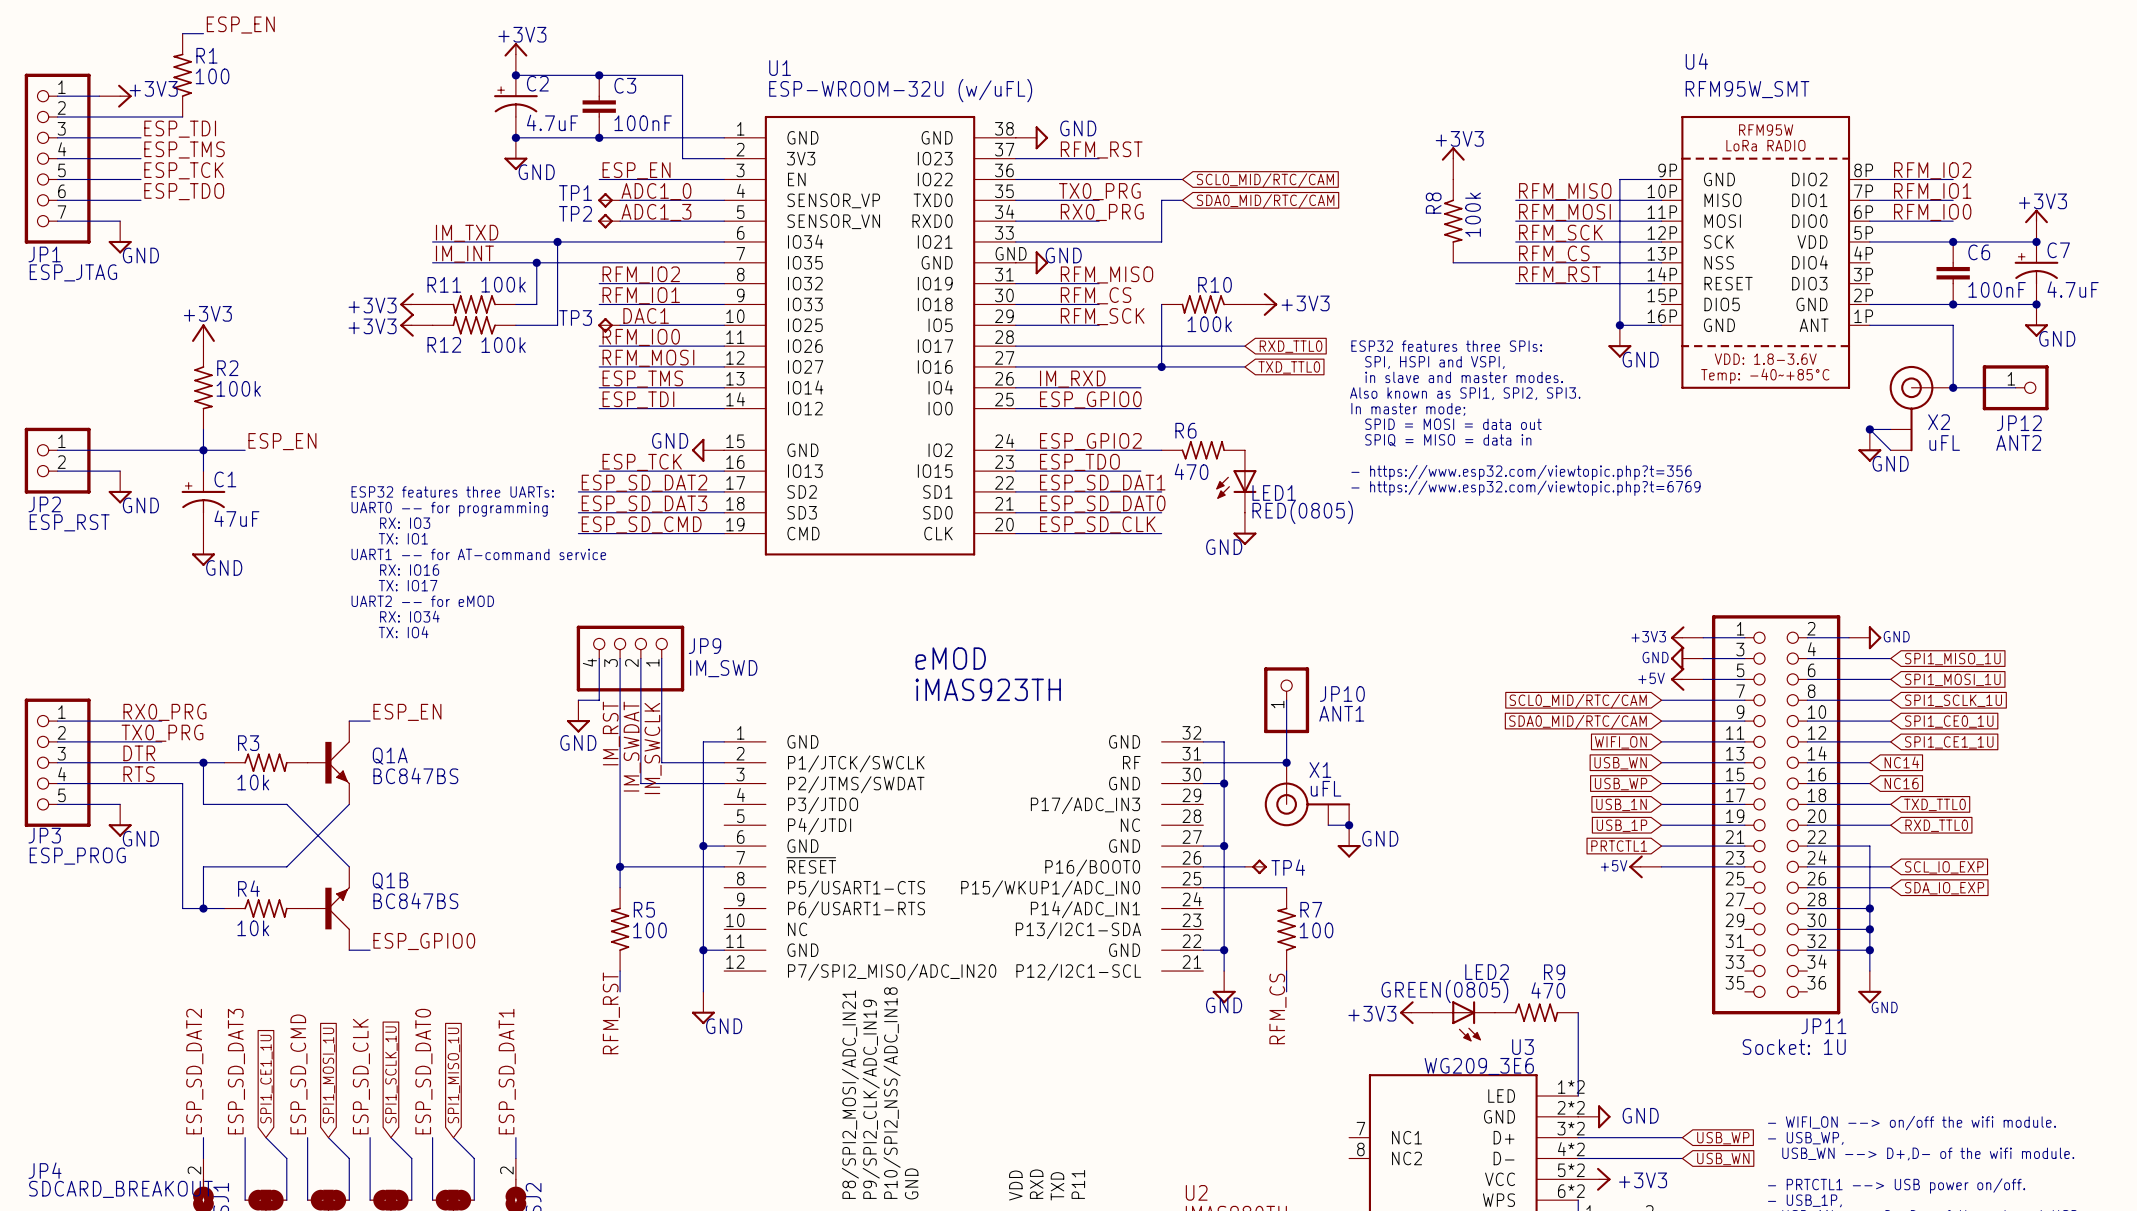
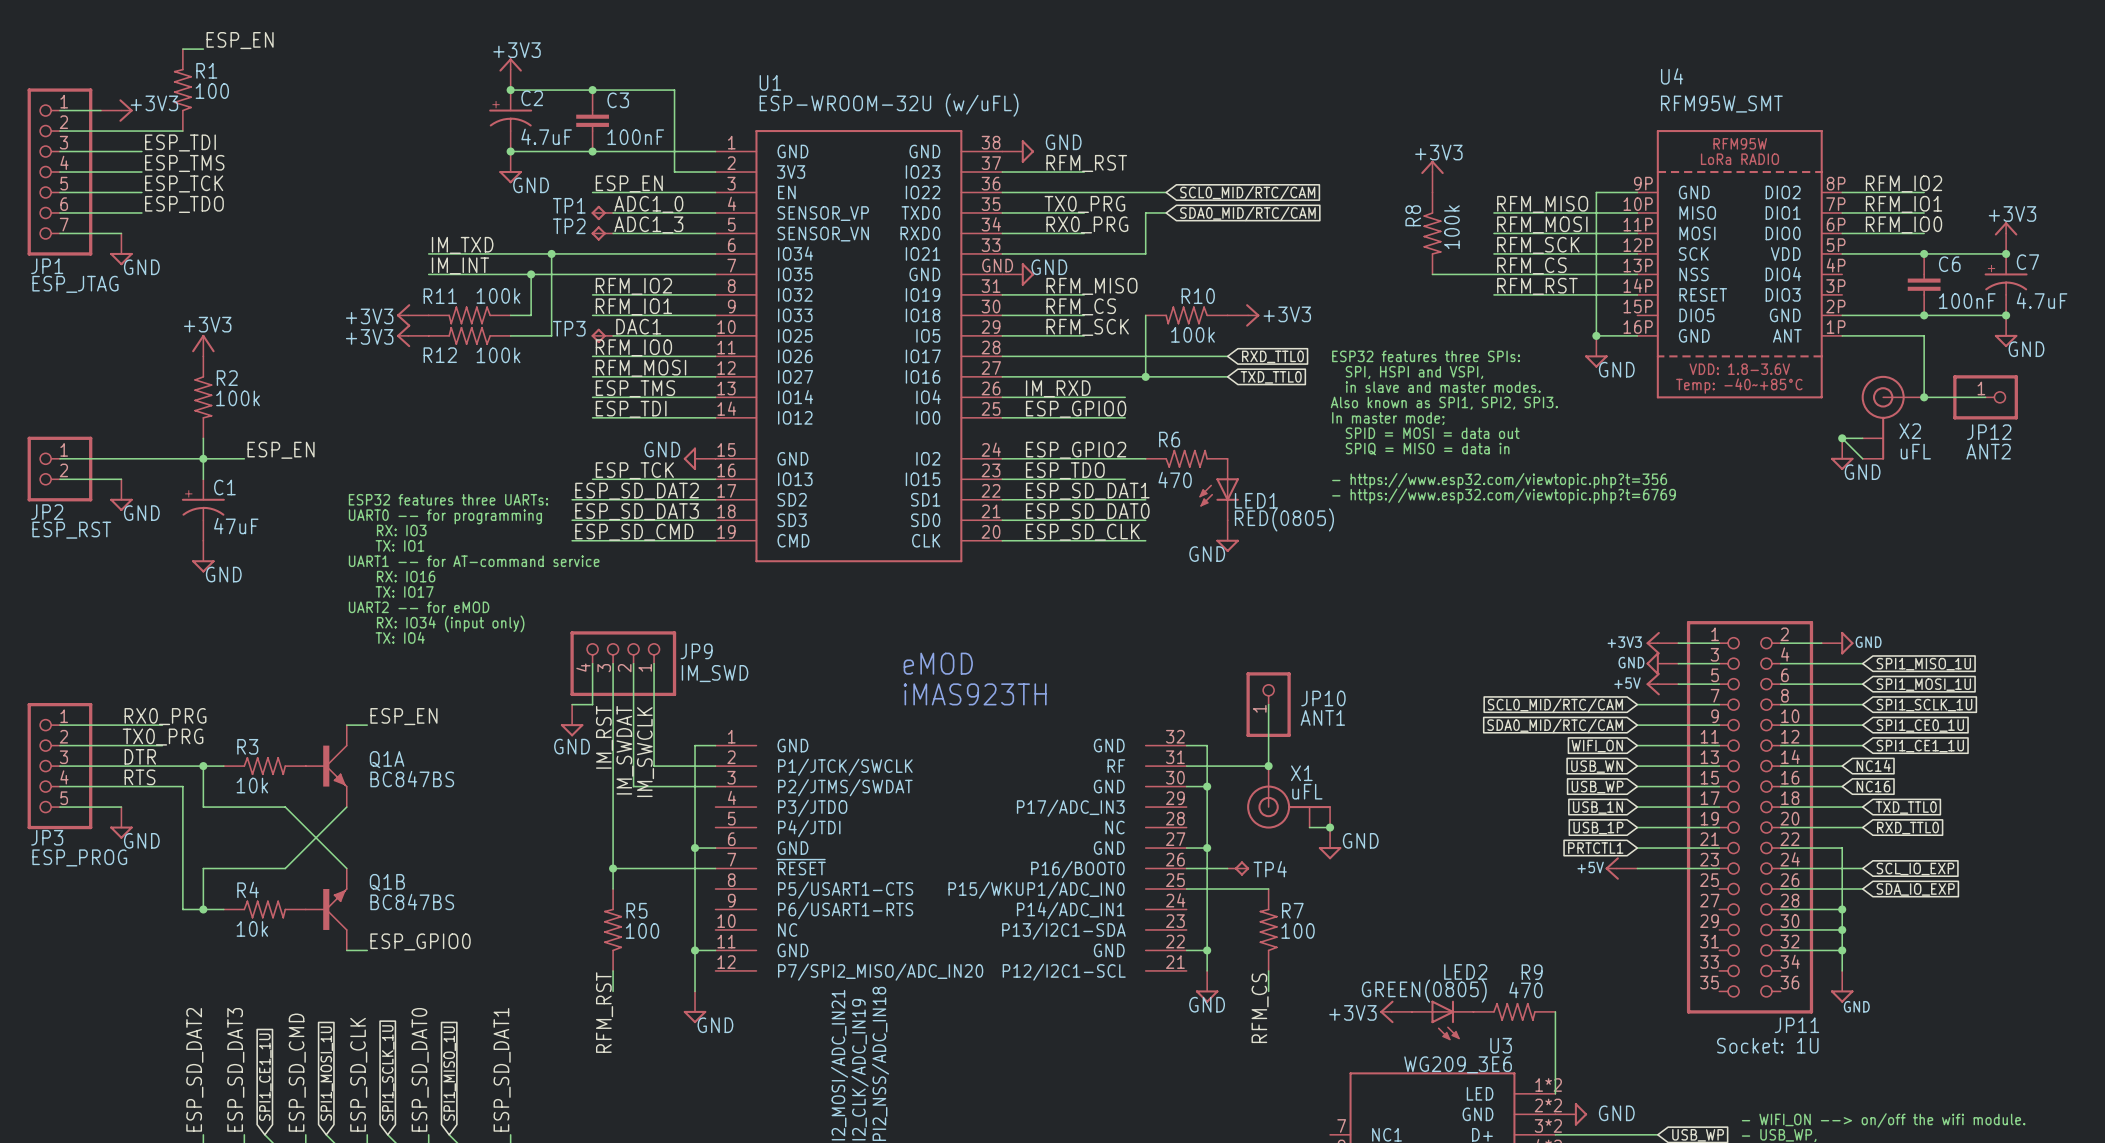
text: RX: IO34 (409, 616) -> RX: IO34 (input only) (450, 623)

